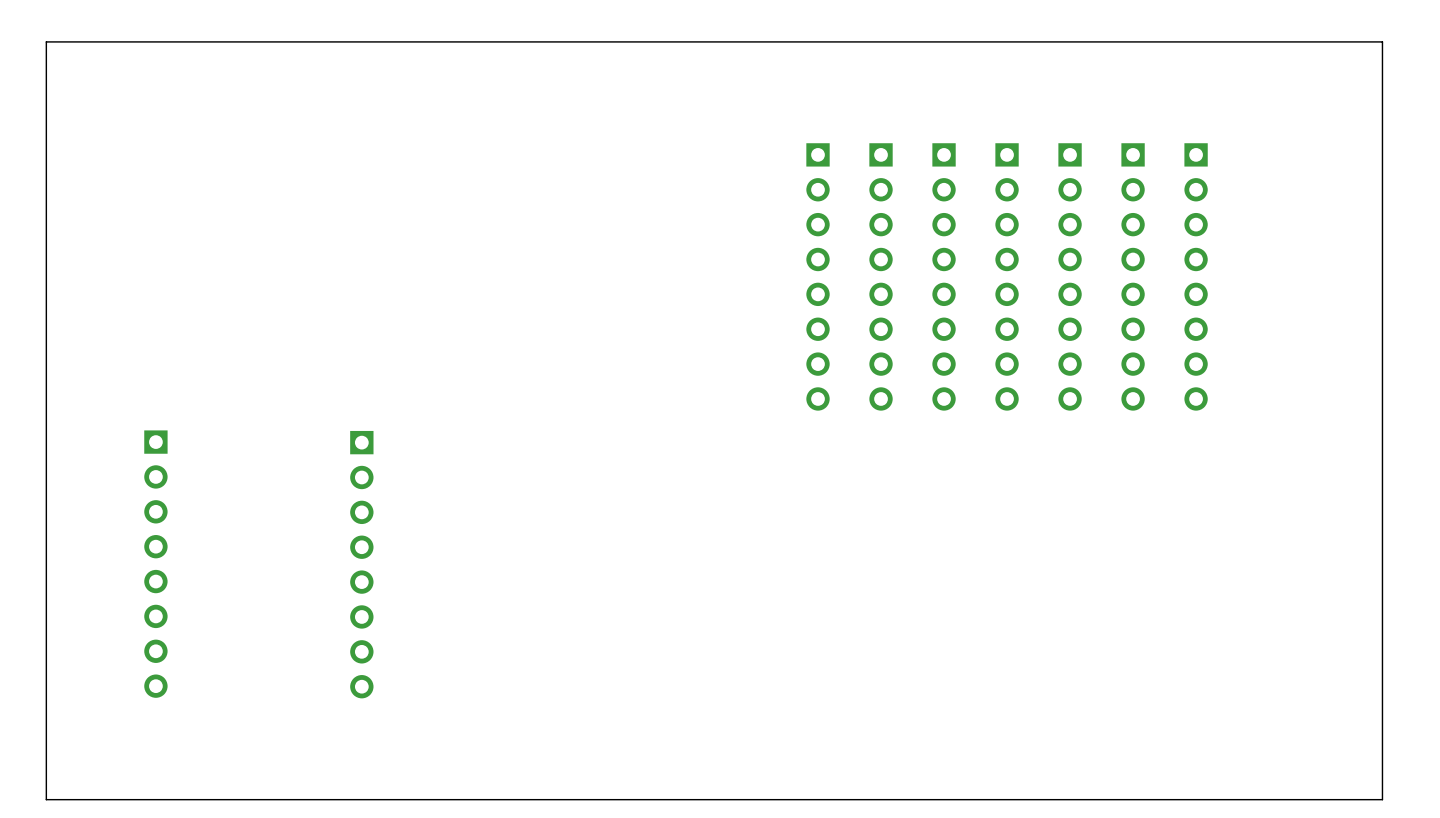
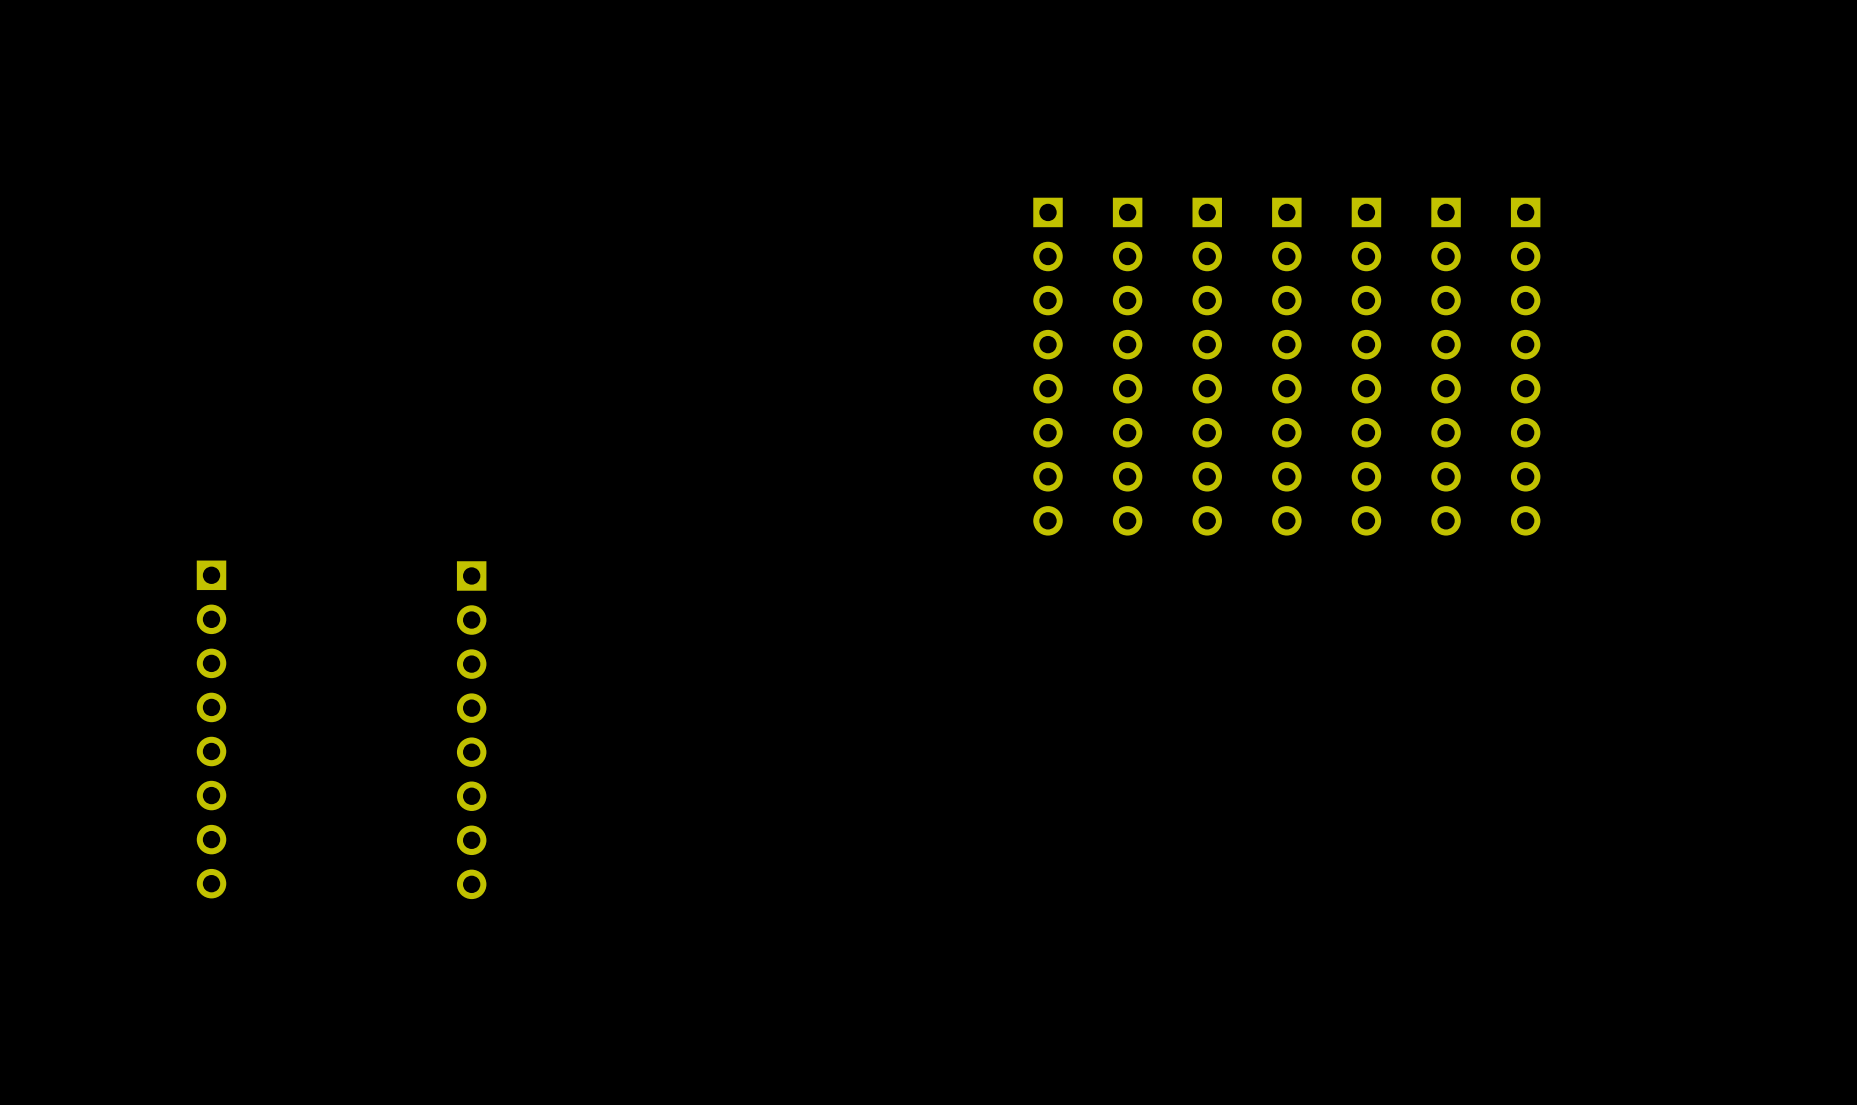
board edge: (1382, 41) (1382, 799) (46, 799) (46, 41) (1382, 41) -> none

